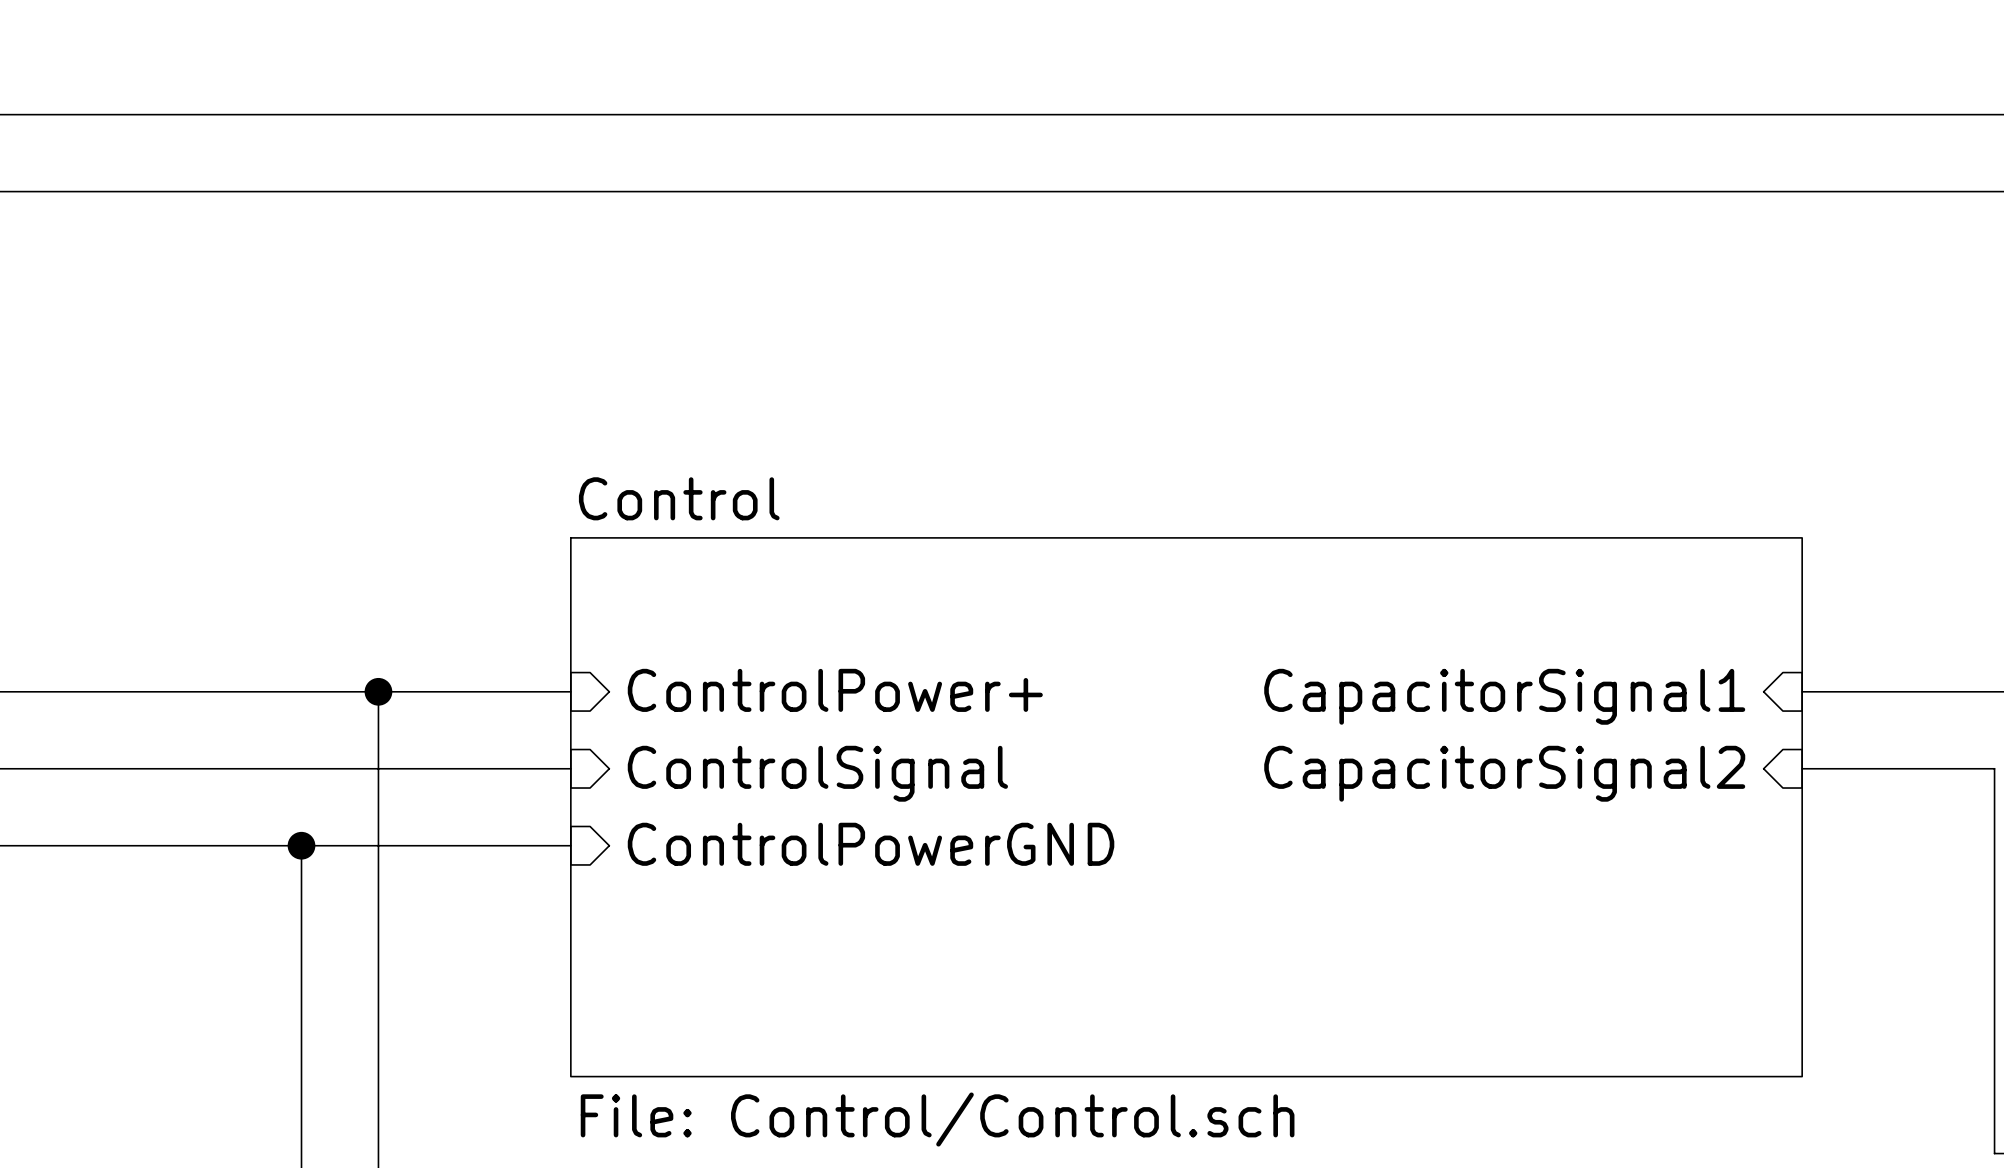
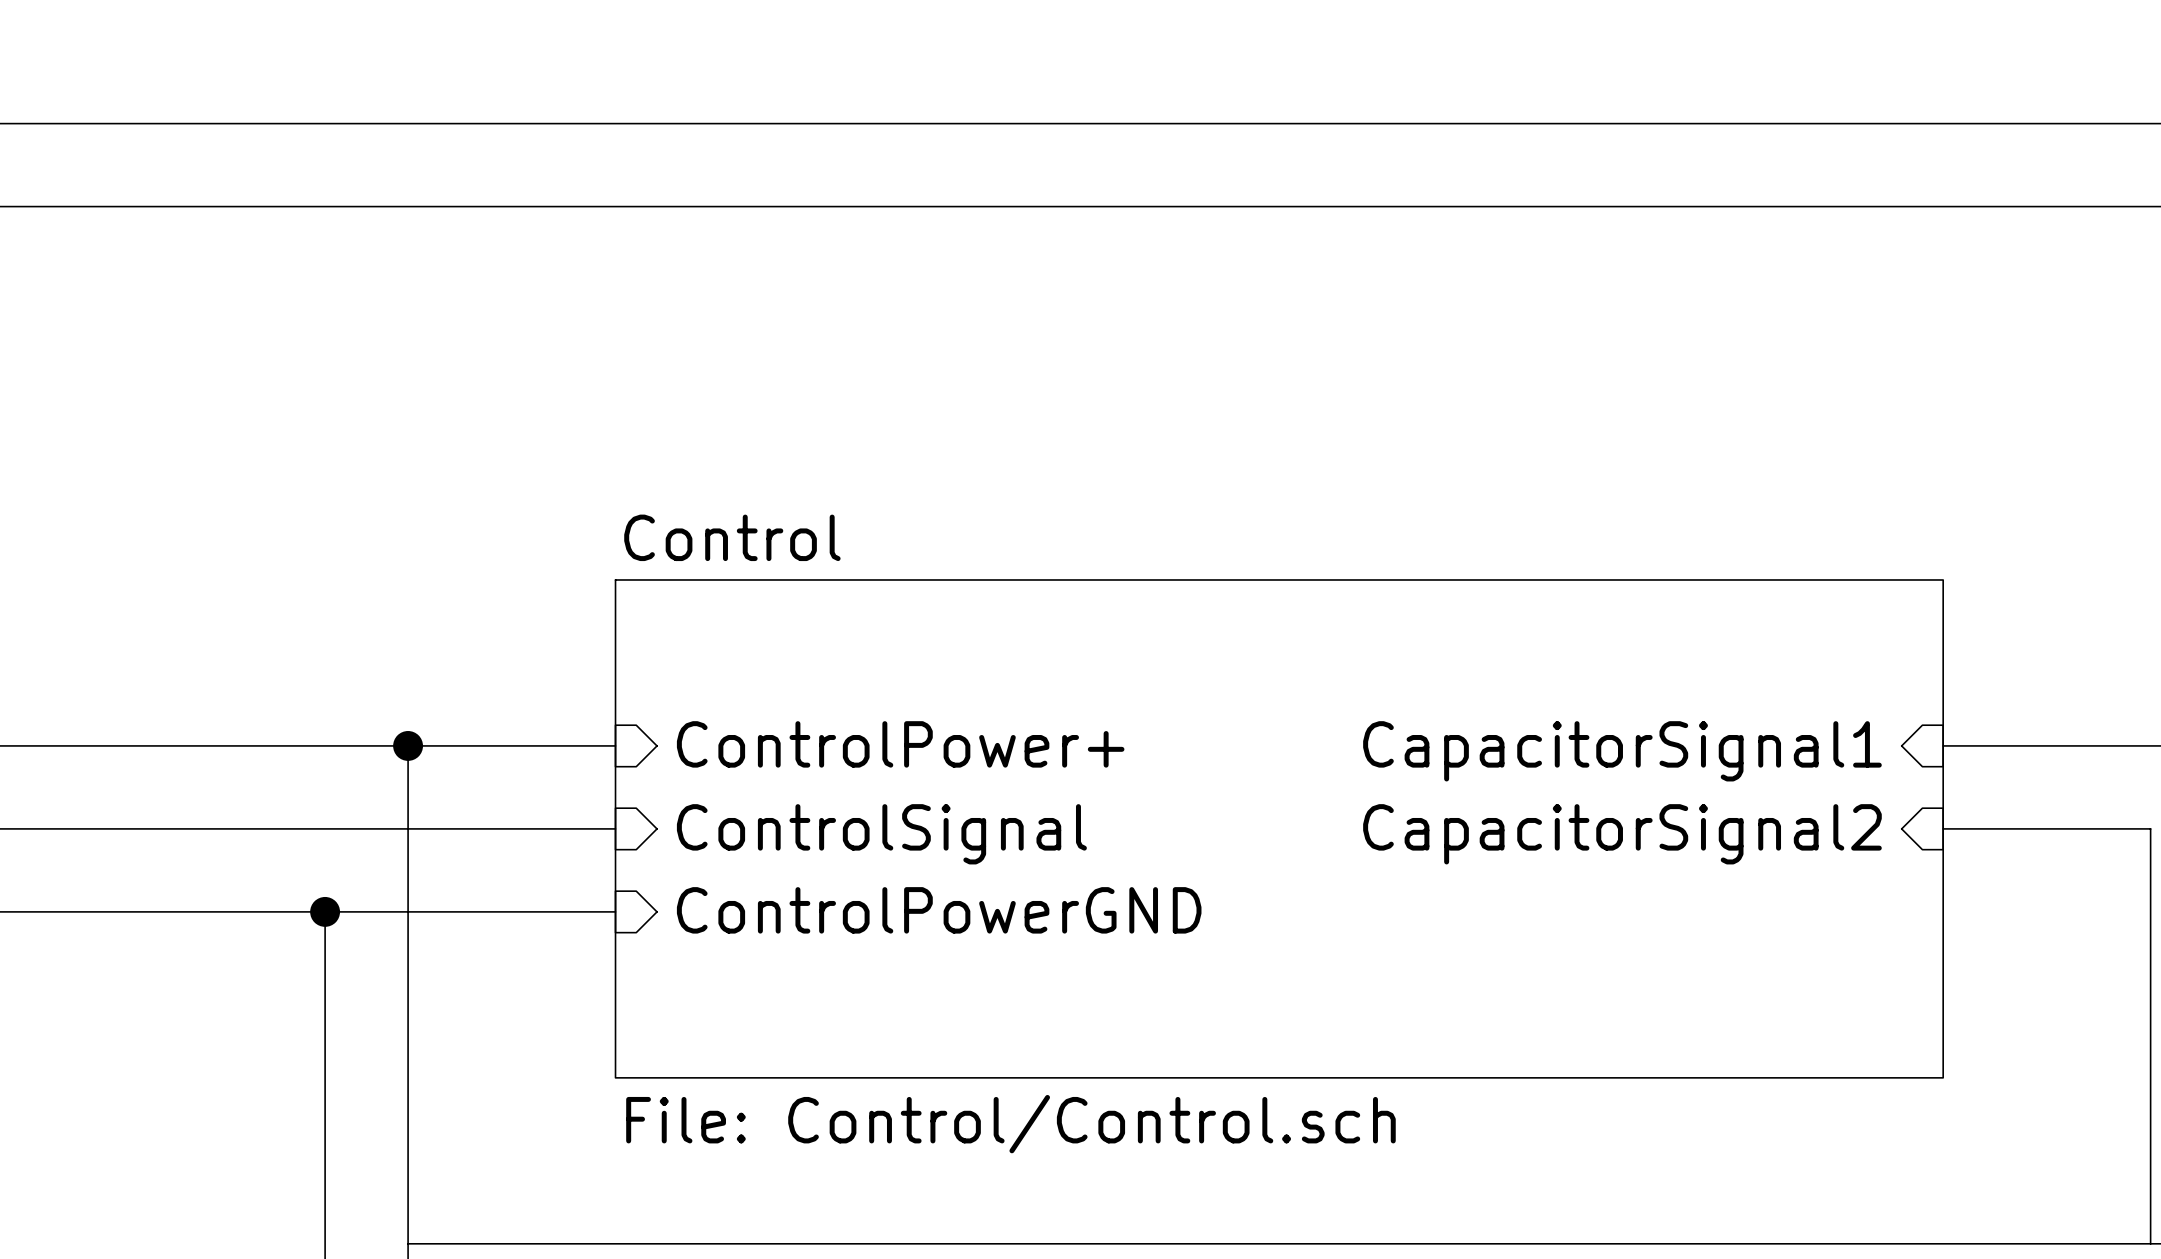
sheet Control: none -> File: Control/Control.sch (1279, 828)
sheet Control: File: Control/Control.sch (1186, 807) -> none
wire: none -> (408, 1243) (2150, 1243)

